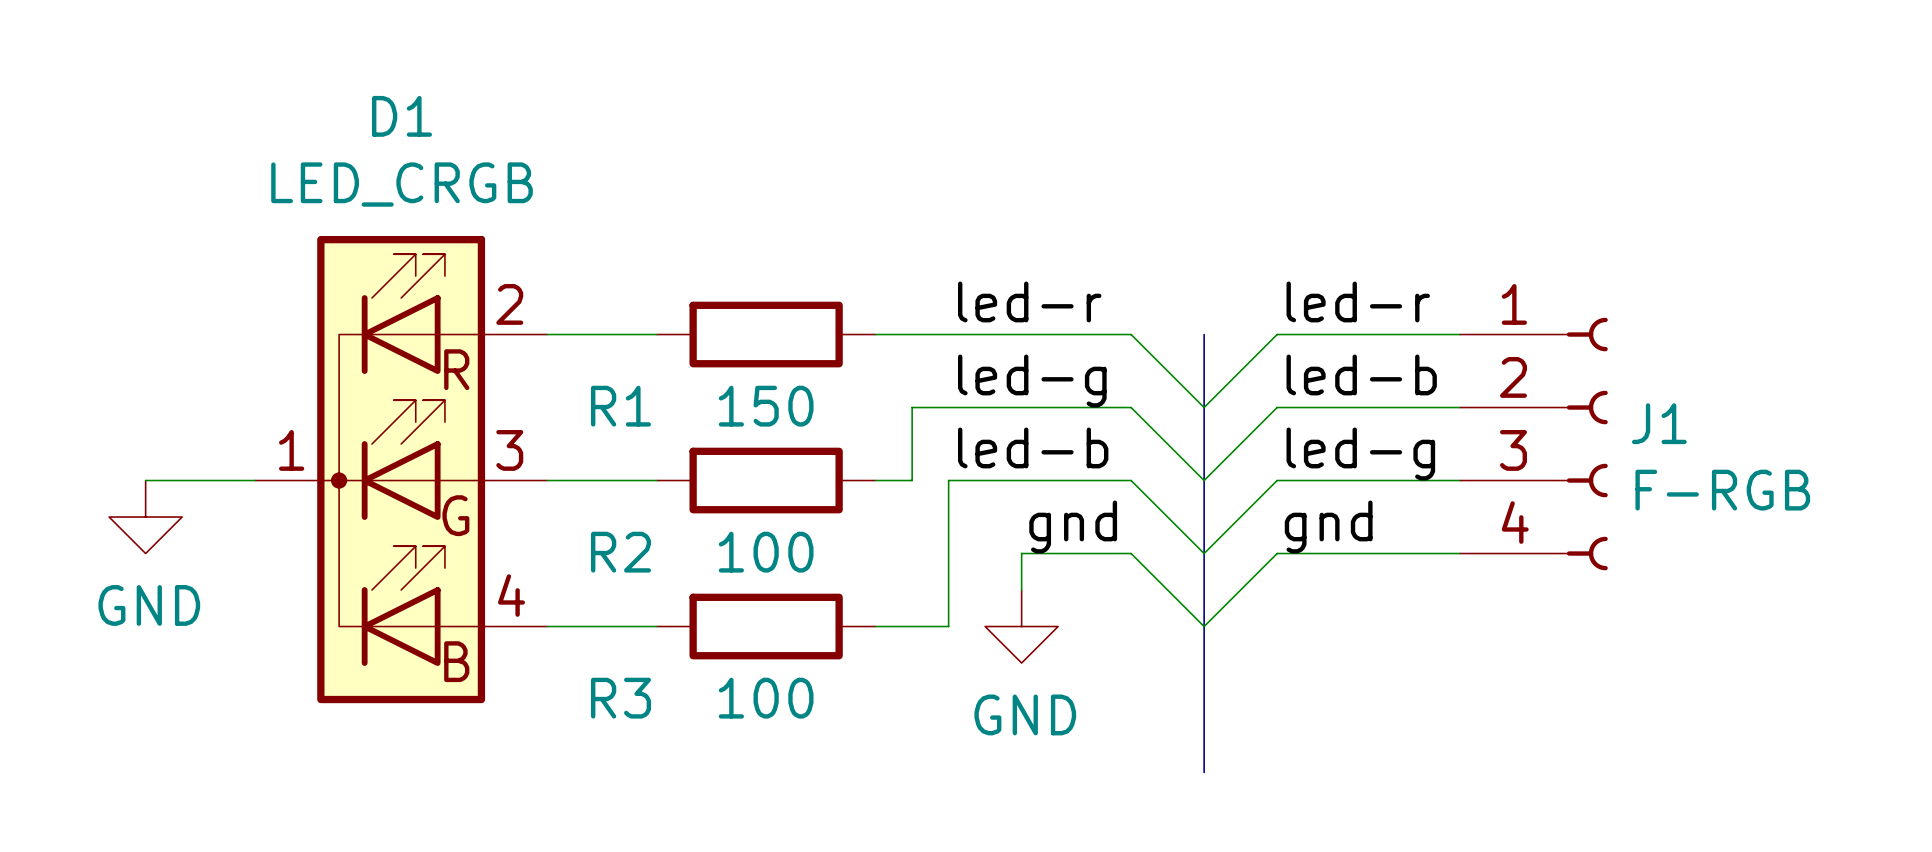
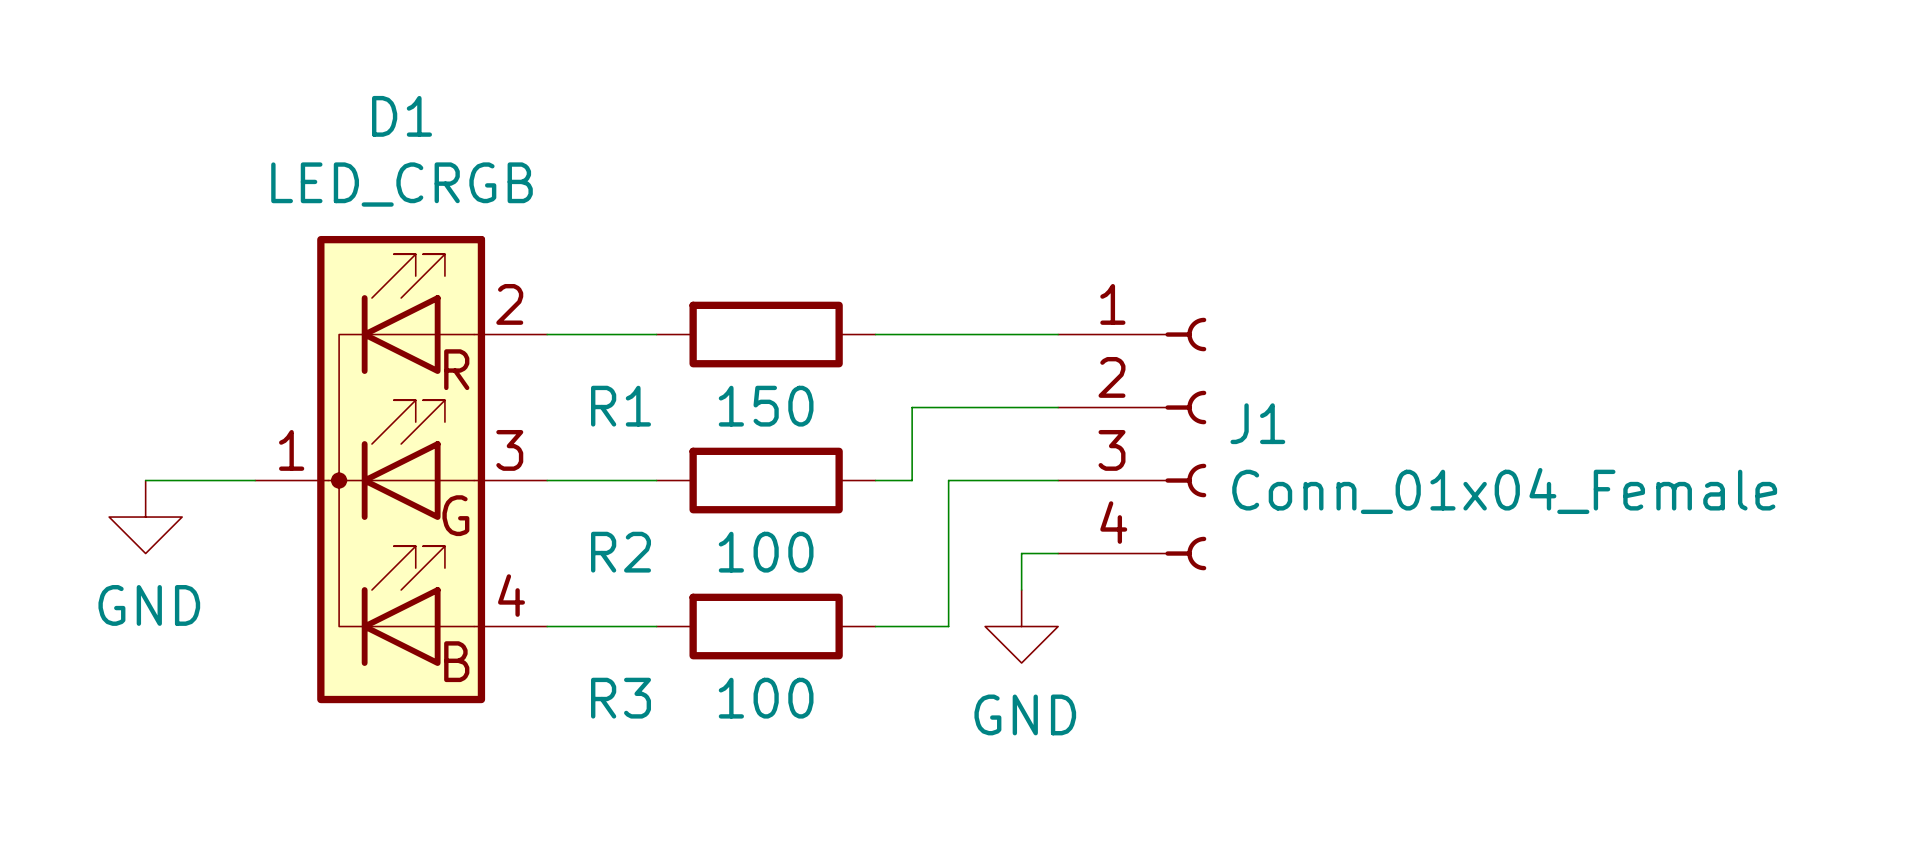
label: led-r (1029, 301) -> none
label: led-r (1358, 301) -> none
wire: (1058, 334) (1131, 334) (1204, 407) (1277, 334) (1459, 334) -> none
bus: (1204, 334) (1204, 772) -> none
label: led-b (1361, 374) -> none
label: led-g (1032, 381) -> none
wire: (1058, 407) (1131, 407) (1204, 480) (1277, 407) (1459, 407) -> none
J1 position: (1533, 444) -> (1132, 444)
label: led-b (1033, 447) -> none
label: led-g (1360, 454) -> none
wire: (1058, 480) (1131, 480) (1204, 553) (1277, 480) (1459, 480) -> none
J1 value: F-RGB (1722, 490) -> Conn_01x04_Female (1504, 490)
label: gnd (1073, 527) -> none
label: gnd (1328, 527) -> none
wire: (1058, 553) (1131, 553) (1204, 626) (1277, 553) (1459, 553) -> none

